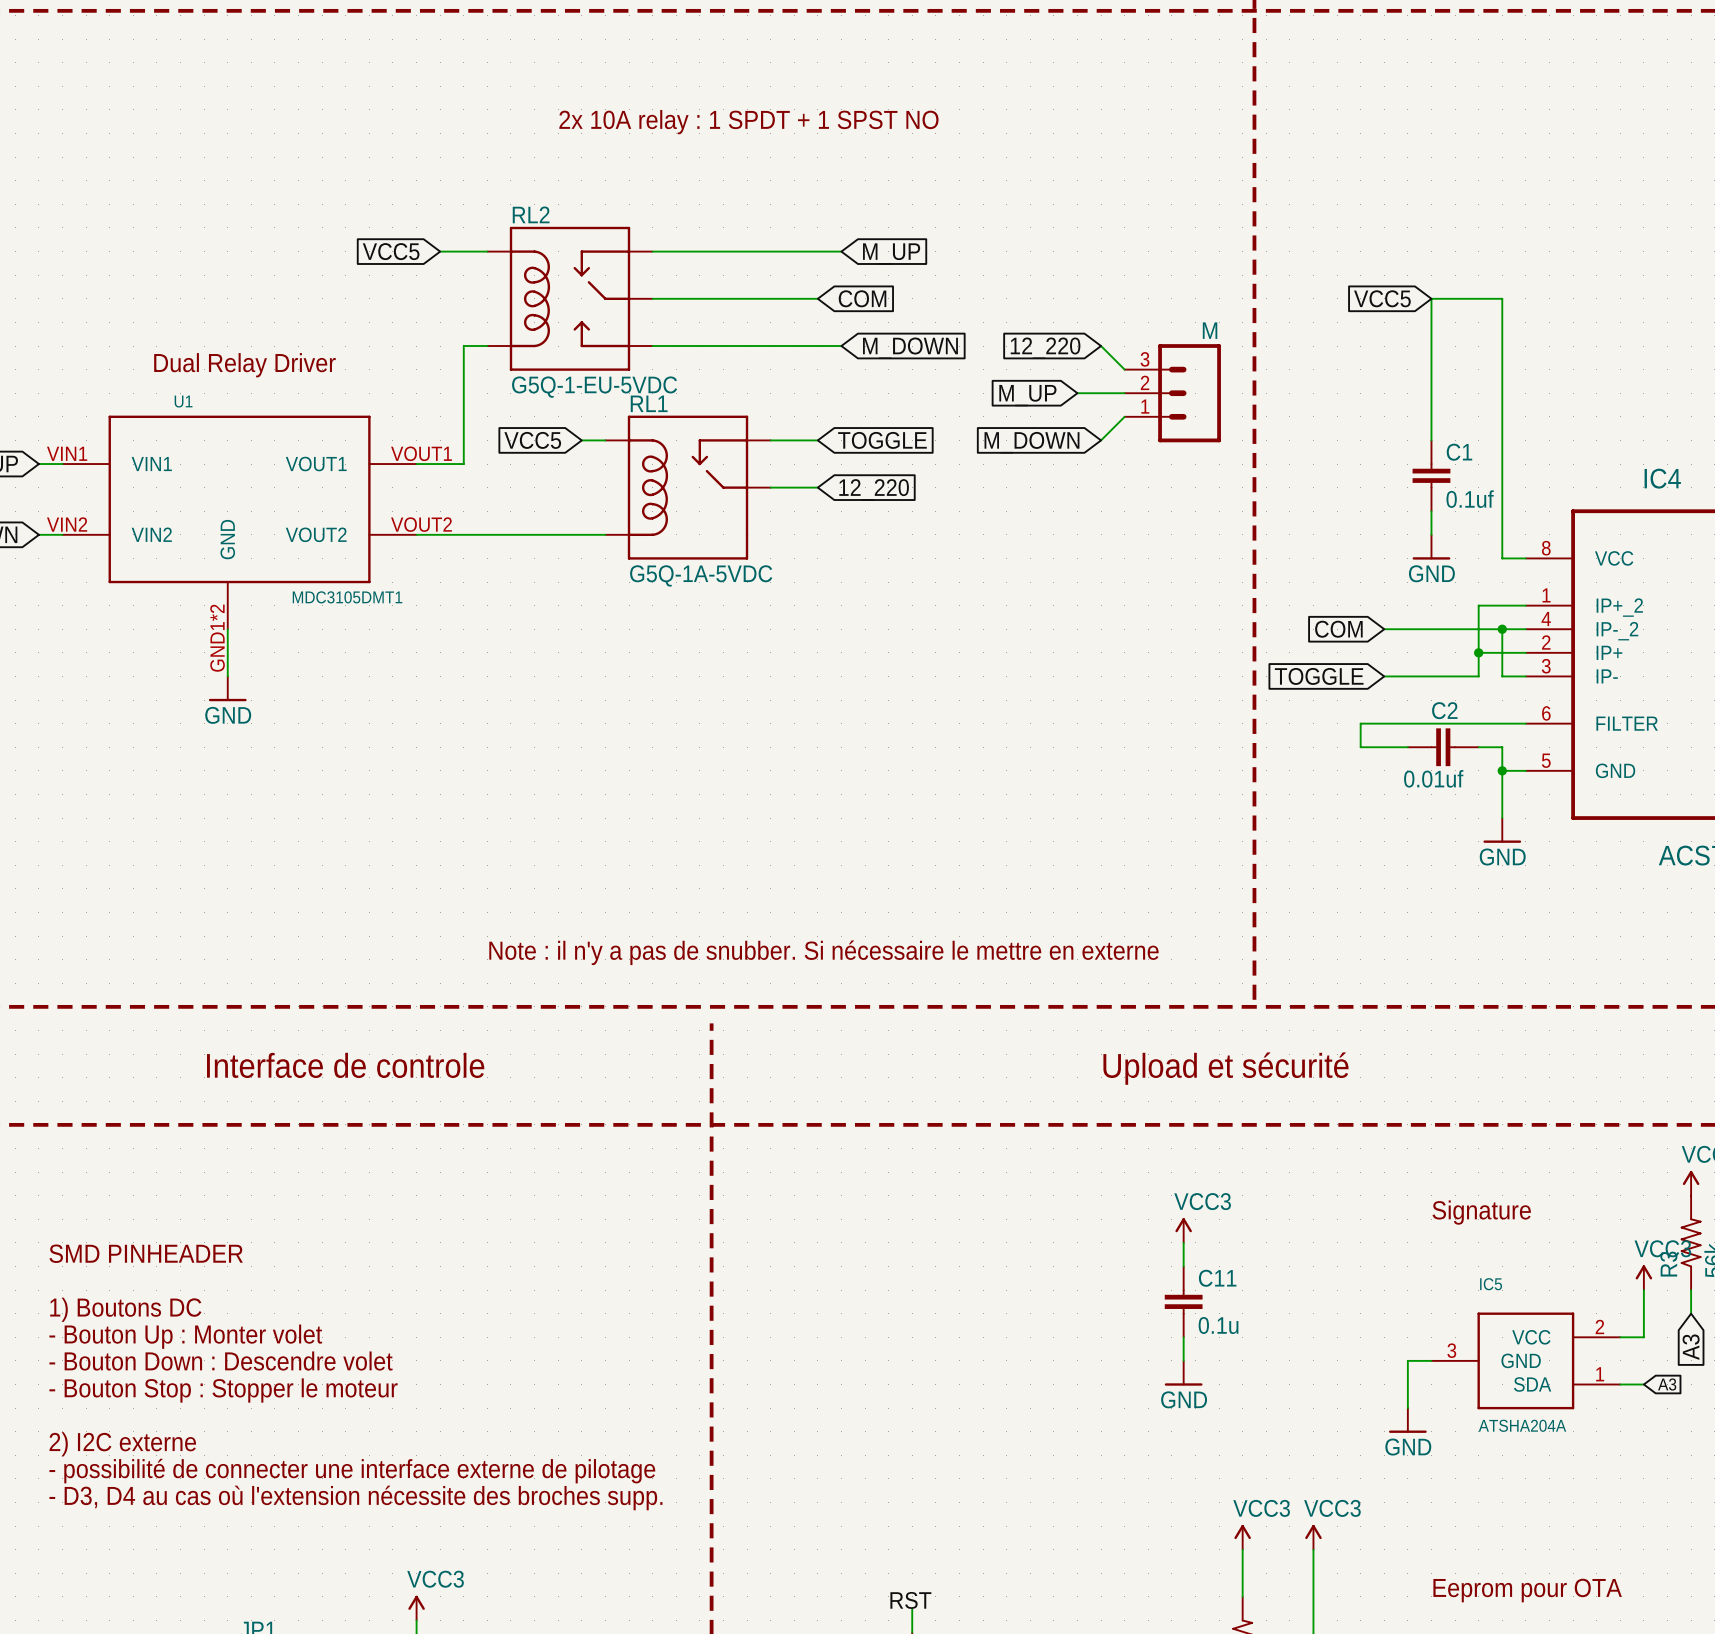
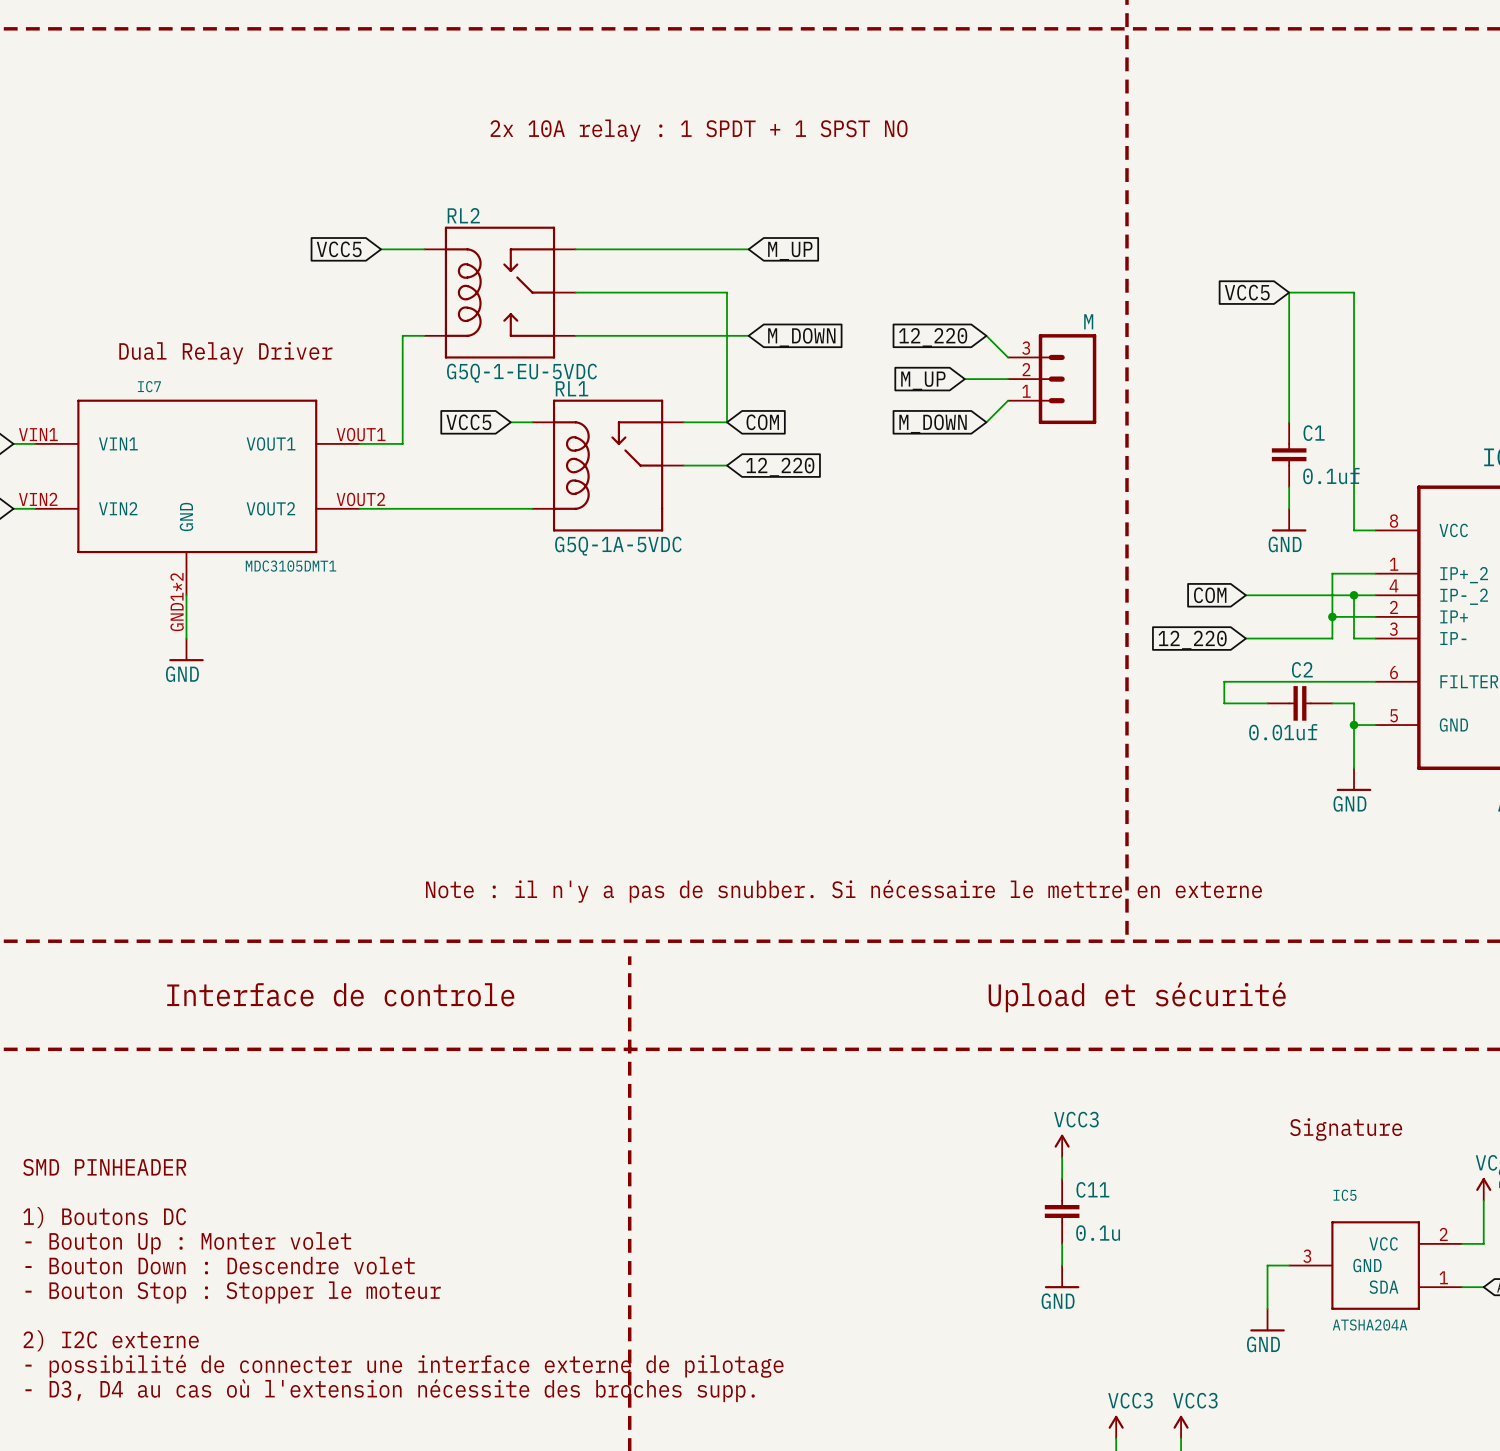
wire: none -> (727, 292) (727, 422)
global label: COM (862, 298) -> none
U1 name: U1 (183, 401) -> IC7 (149, 386)
global label: TOGGLE (882, 440) -> COM (762, 422)
global label: TOGGLE (1319, 676) -> 12_220 (1192, 640)

